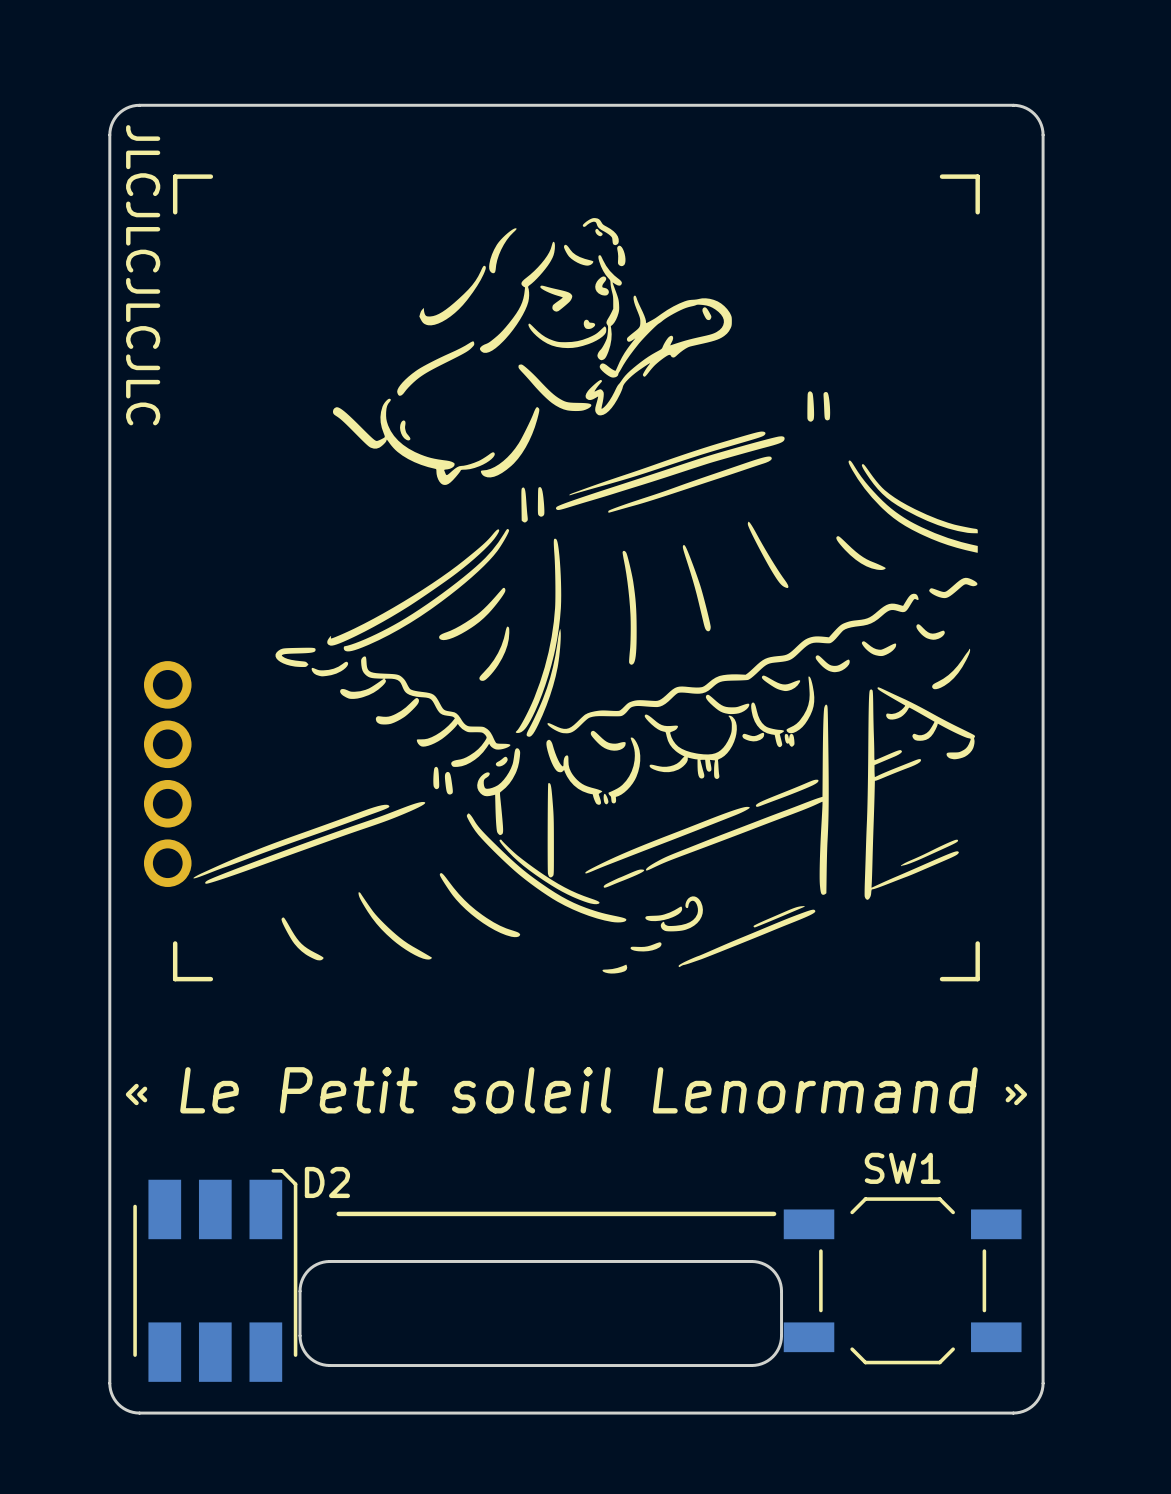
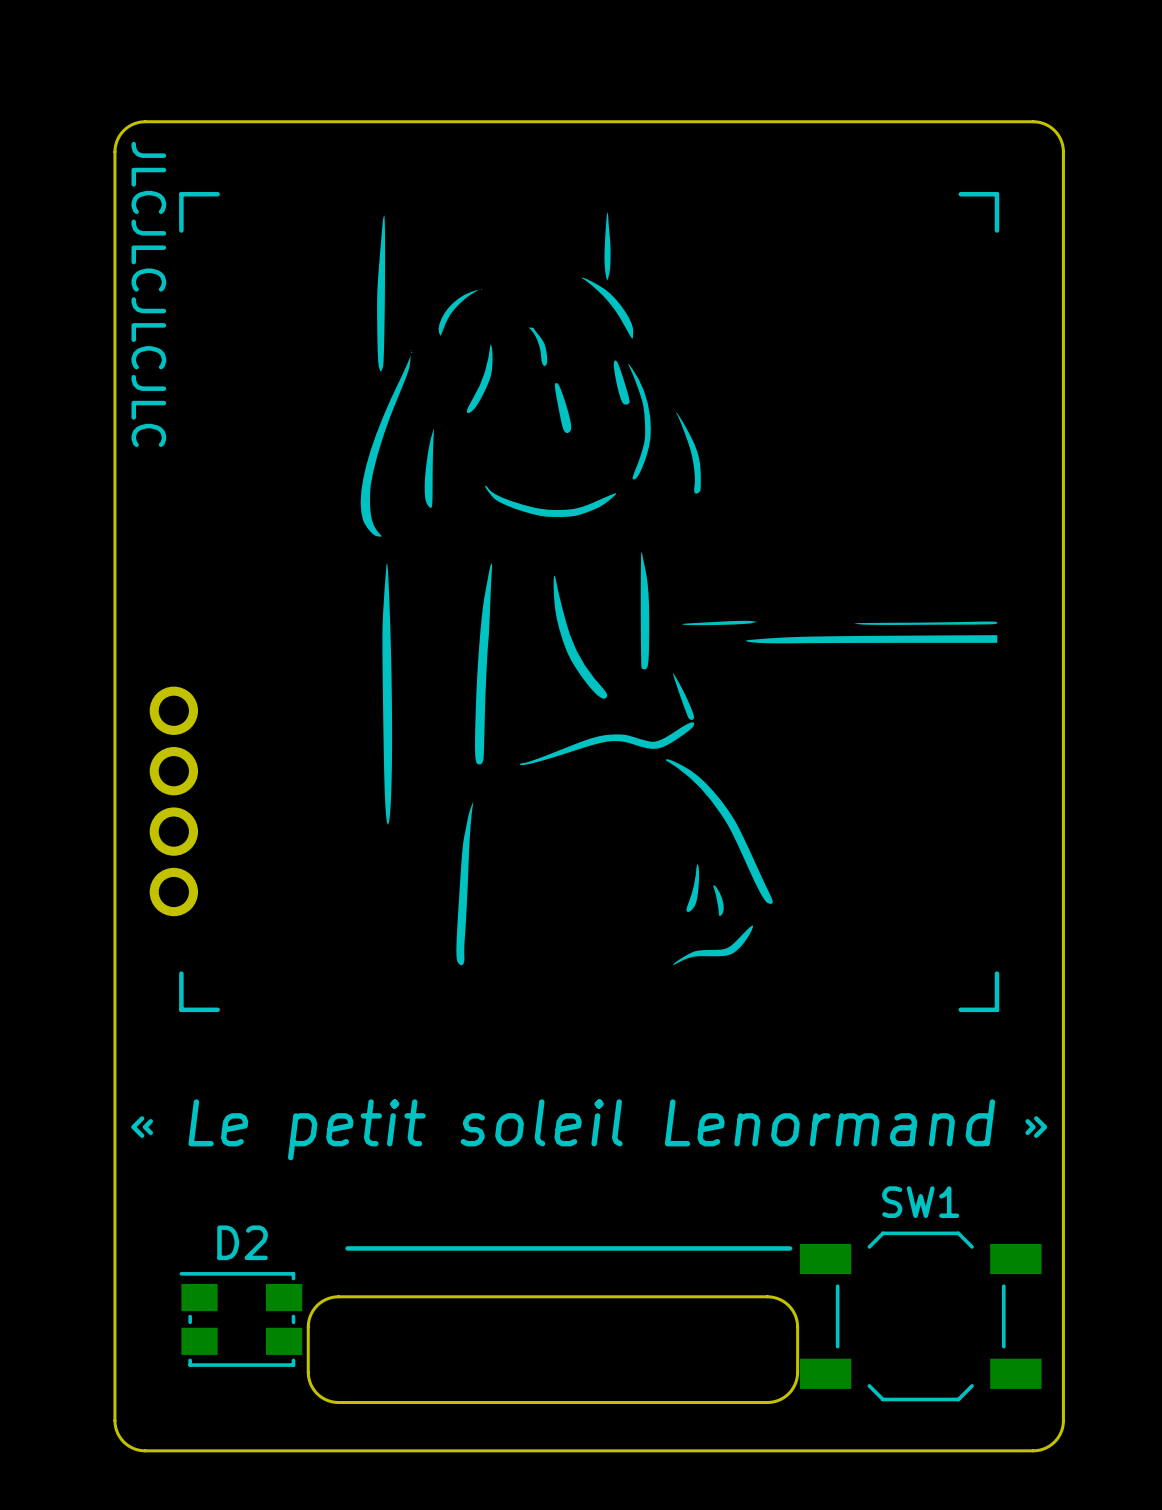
drawing: none -> [360, 212, 998, 966]
drawing: [193, 218, 978, 974] -> none
text: Le Petit soleil Lenormand (579, 1090) -> Le petit soleil Lenormand (591, 1129)
D2 footprint: [133, 1169, 298, 1382] -> [179, 1272, 303, 1367]
D2 name position: D2 (327, 1182) -> D2 (242, 1242)

